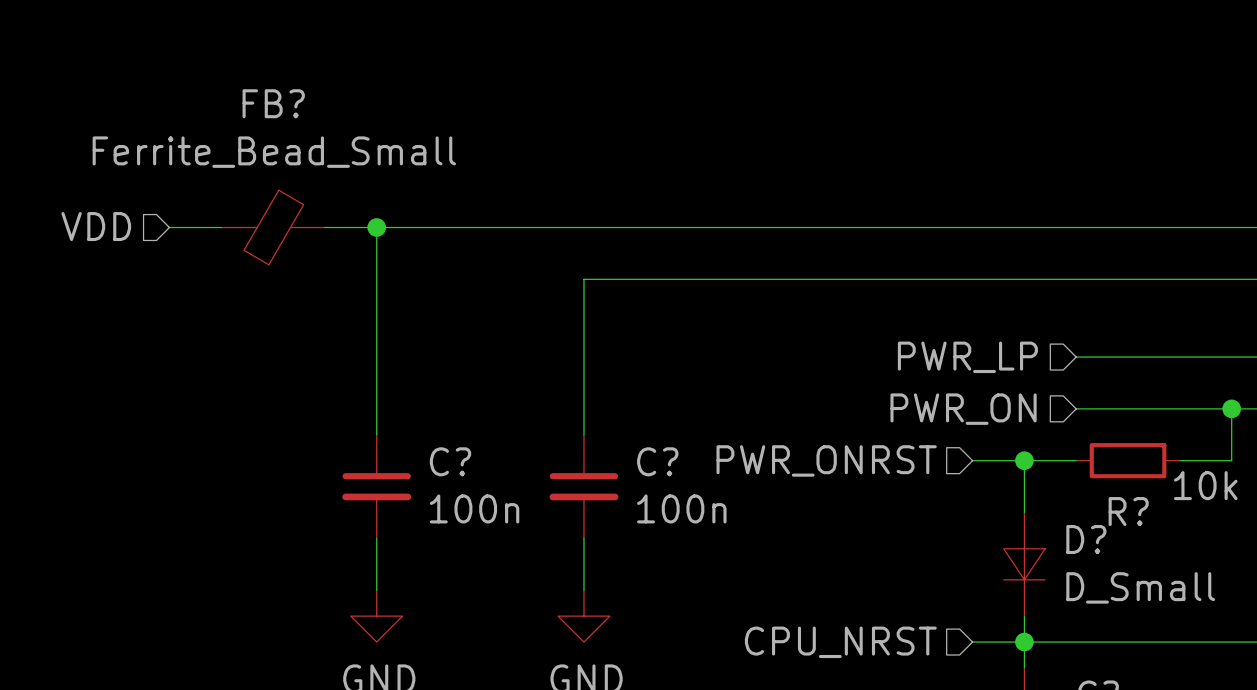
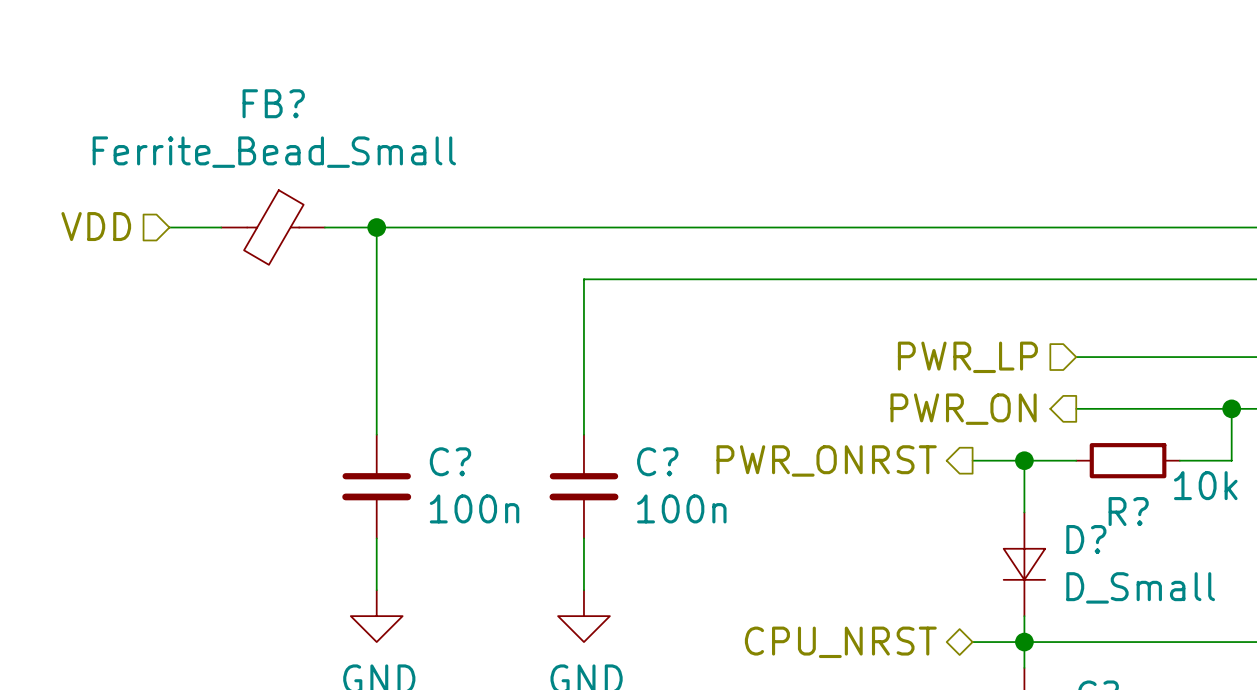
hierarchical label shape: input (963, 409) -> output (963, 409)
hierarchical label shape: input (826, 460) -> output (826, 460)
hierarchical label shape: input (840, 642) -> bidirectional (840, 642)

